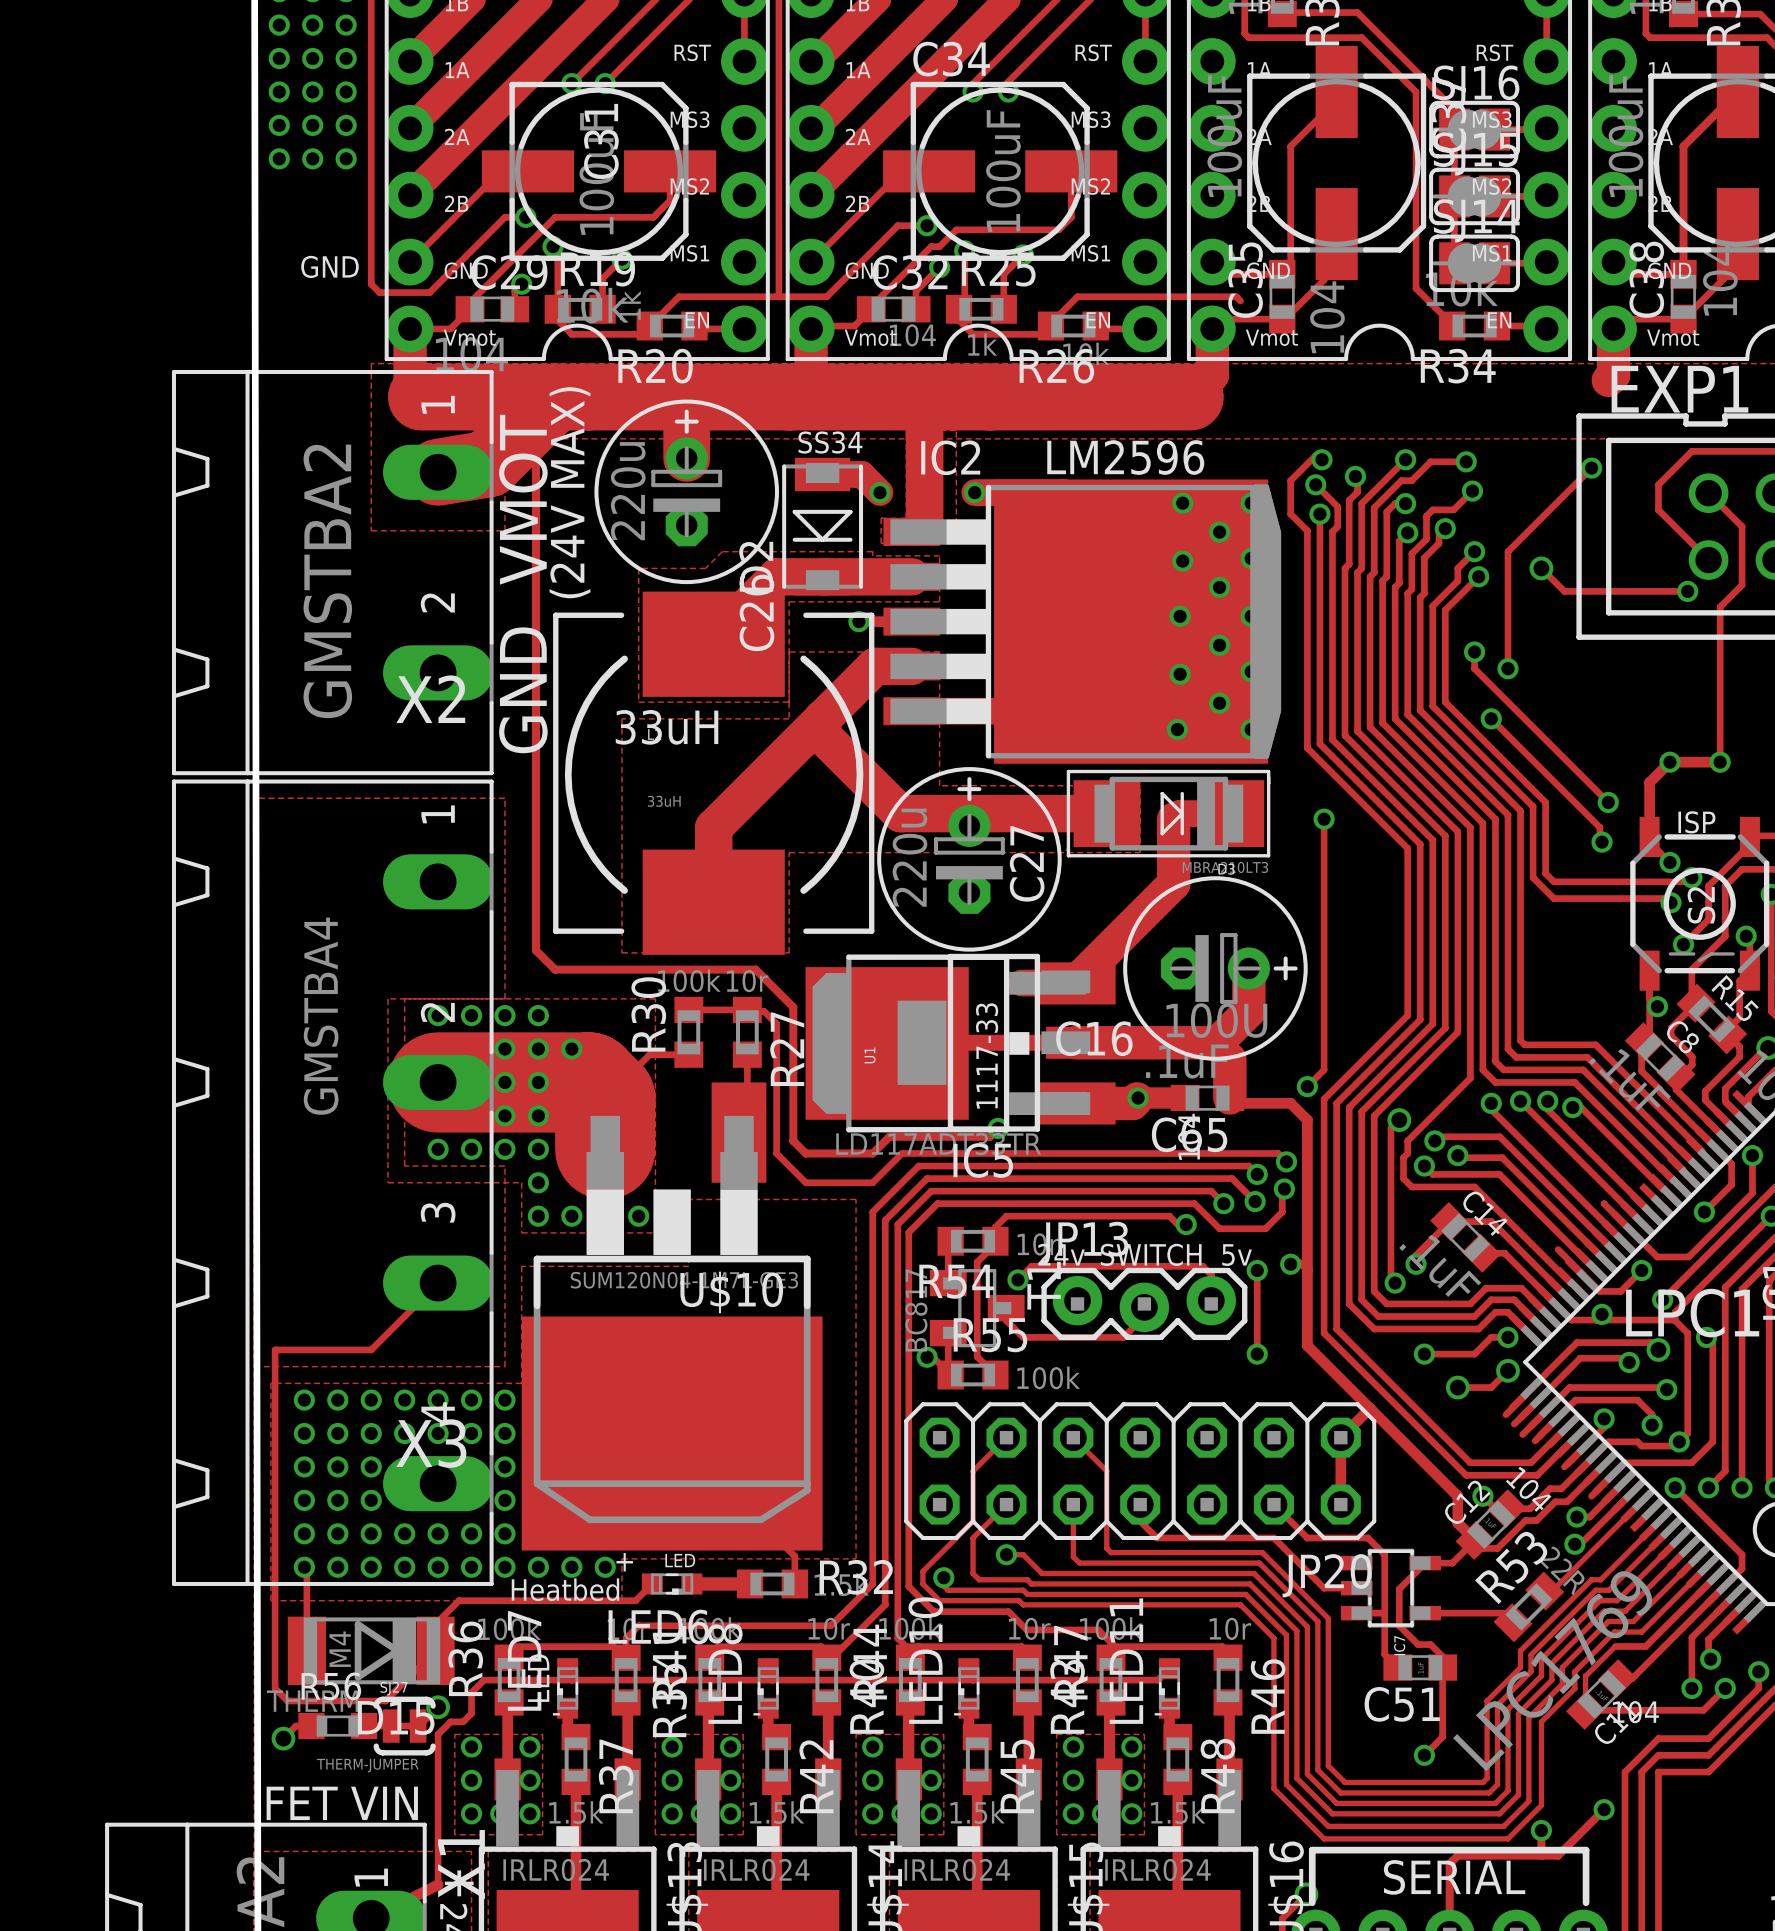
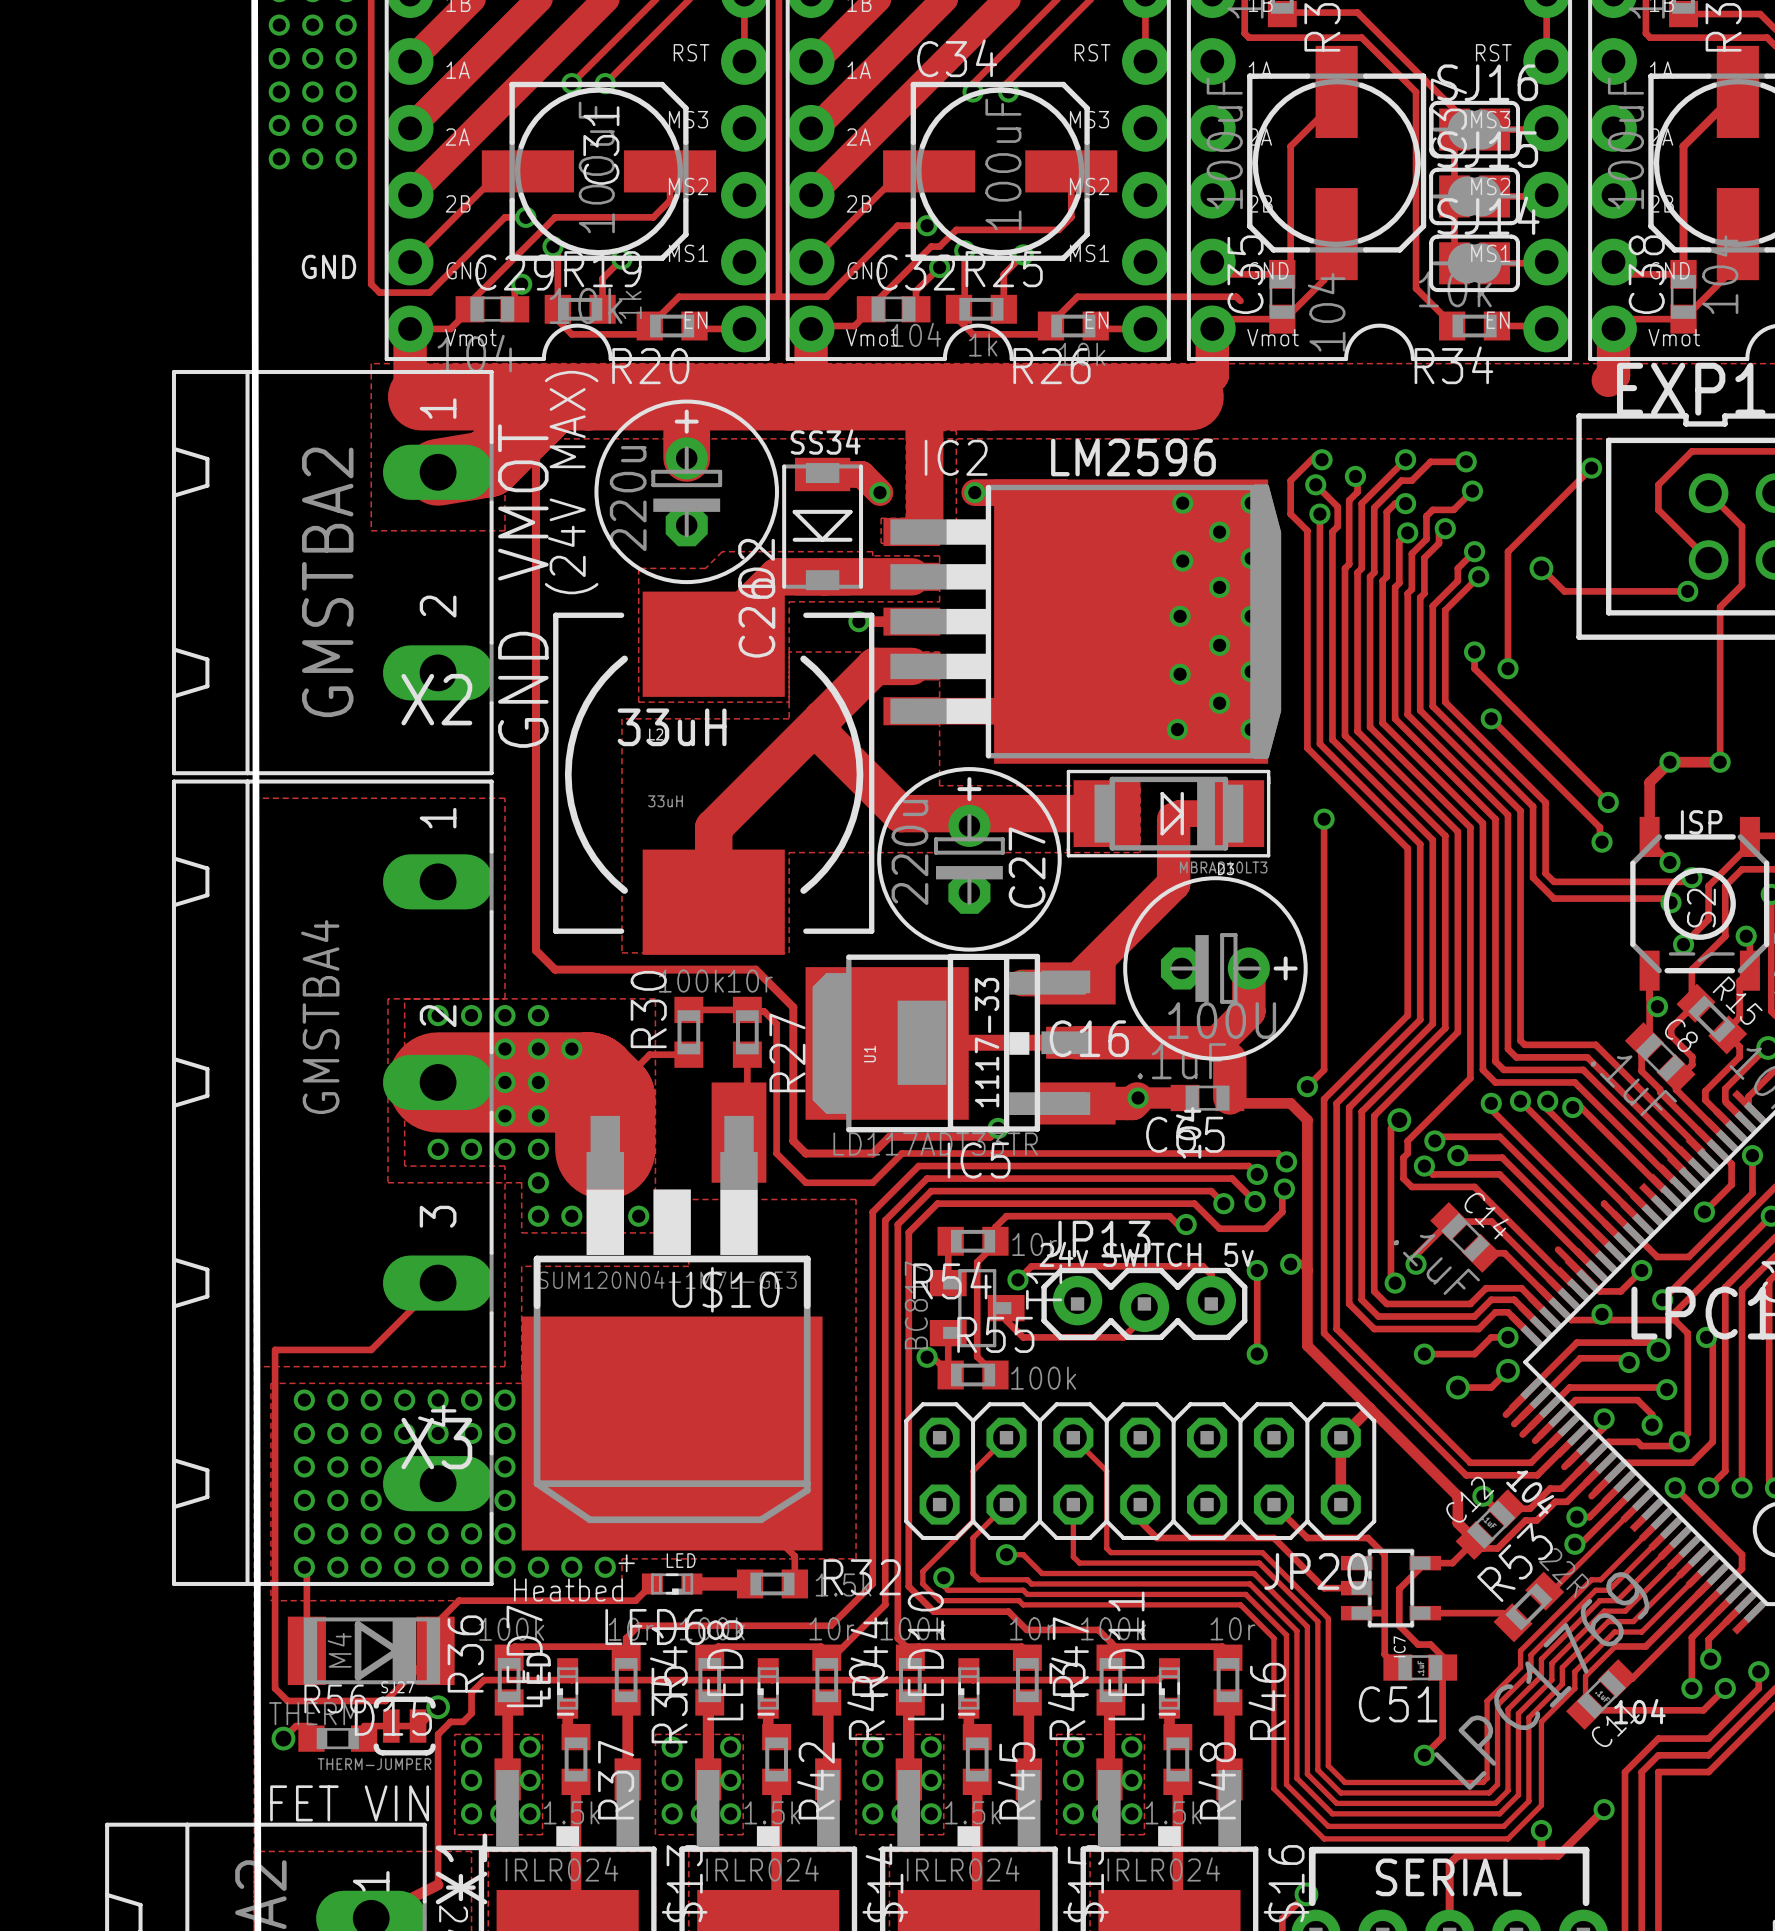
R56 position: (337, 1726) -> (337, 1738)

